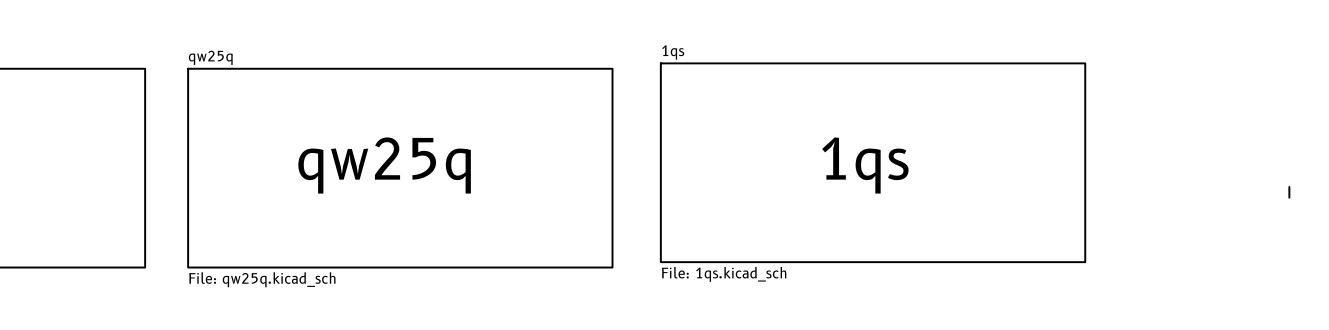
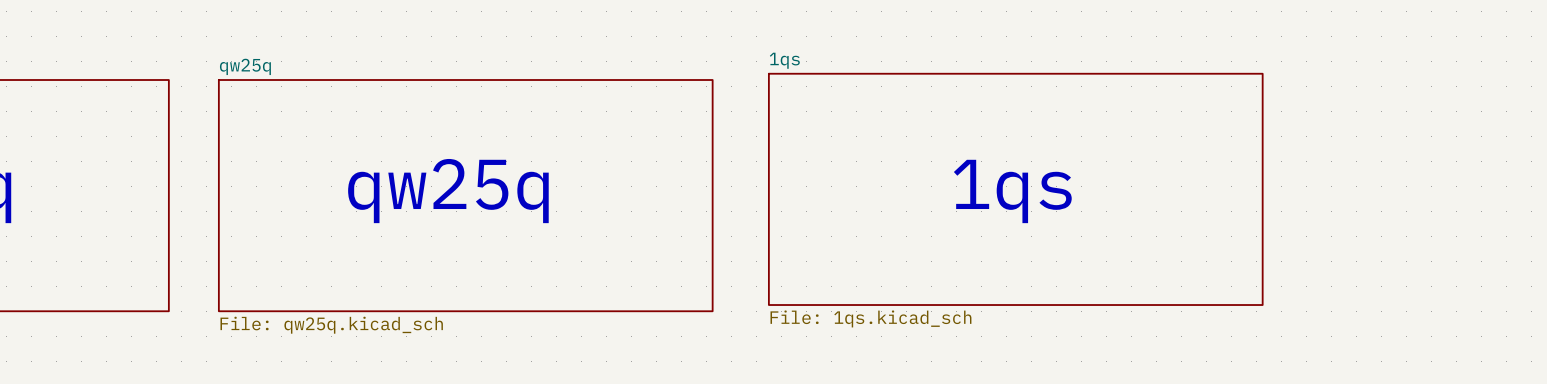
wire: (1289, 186) (1289, 197) -> none

